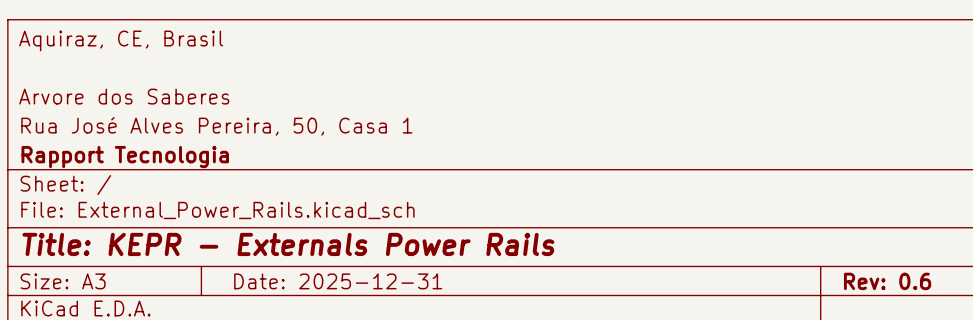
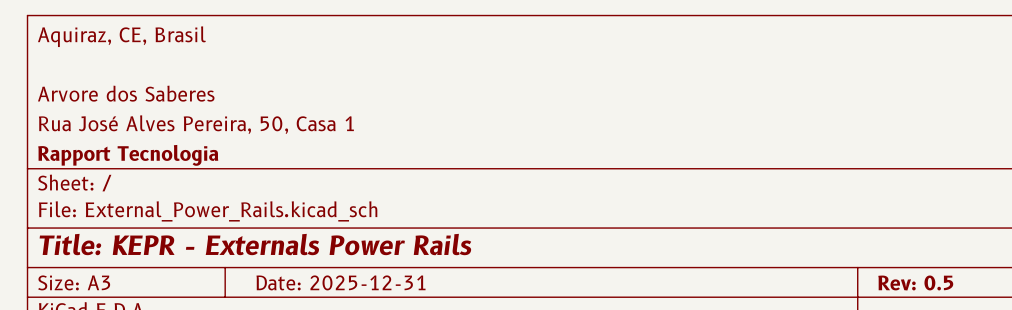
title block: Rev: 0.6 (887, 281) -> Rev: 0.5 (915, 282)

